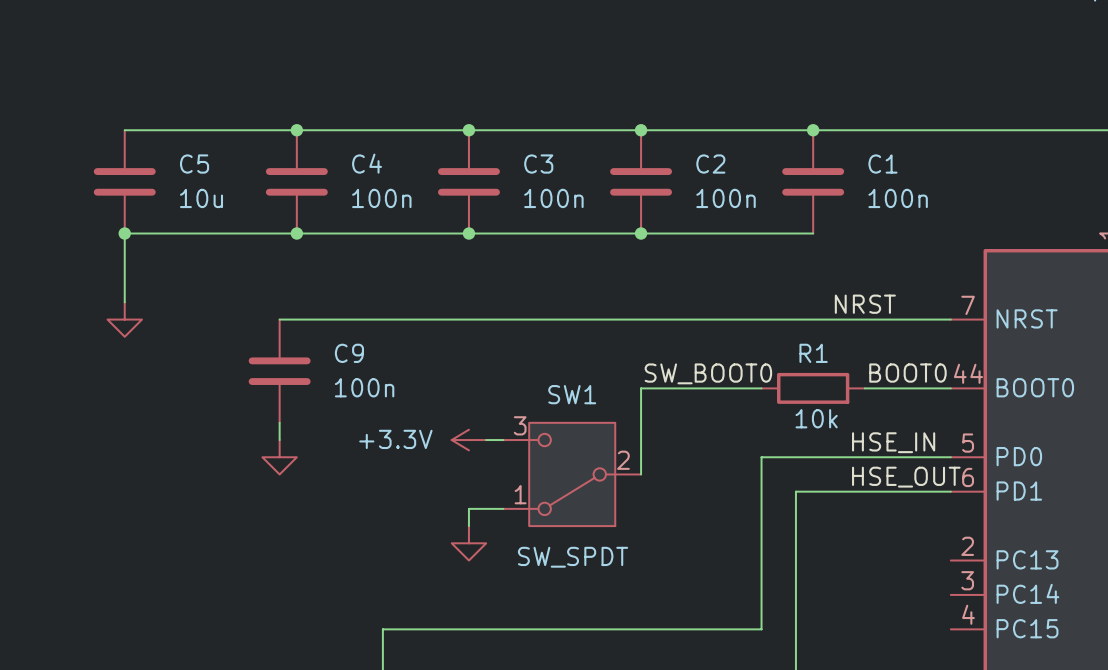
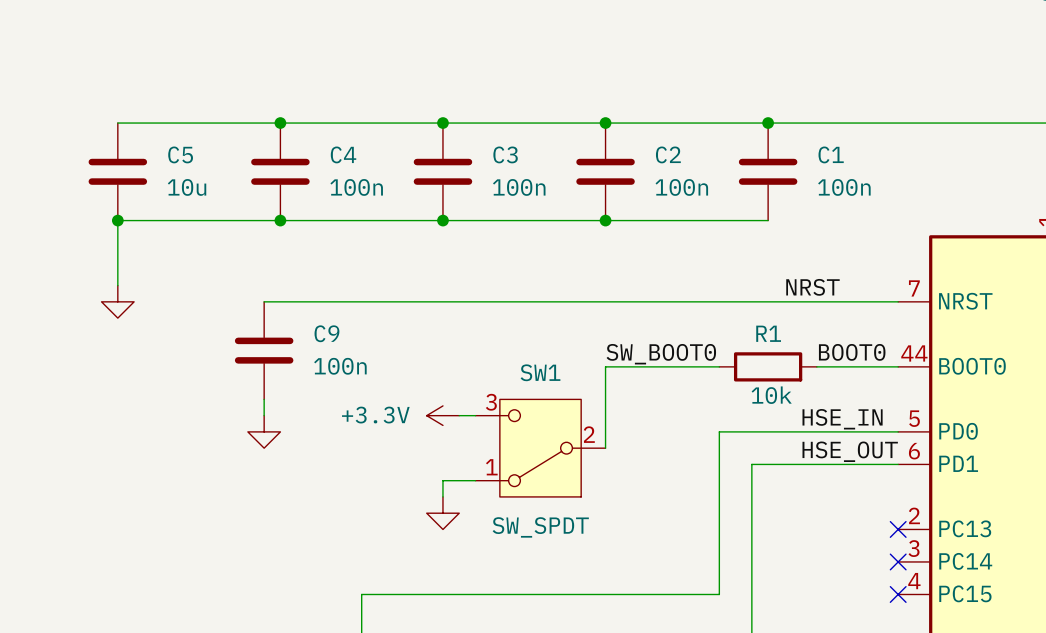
no-connect mark: none -> (898, 529)
no-connect mark: none -> (898, 561)
no-connect mark: none -> (898, 594)

